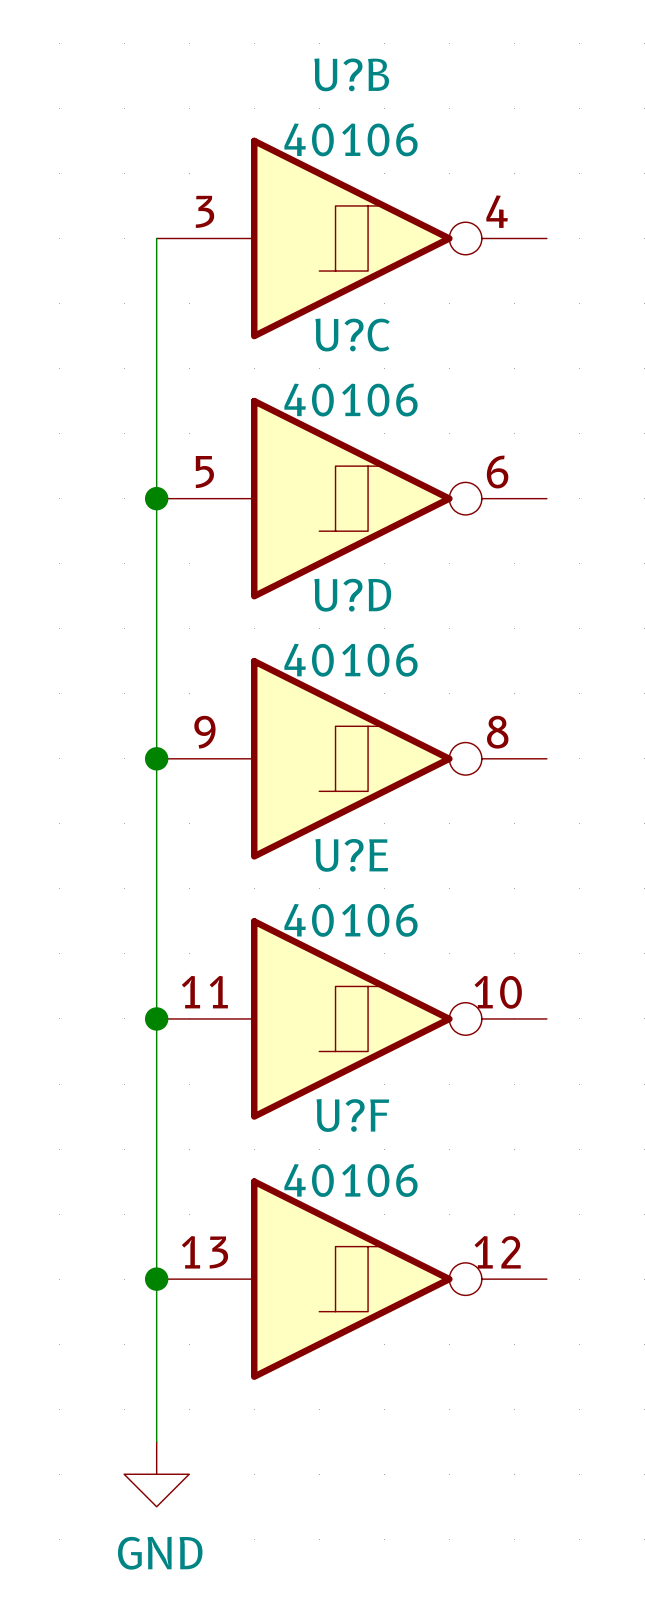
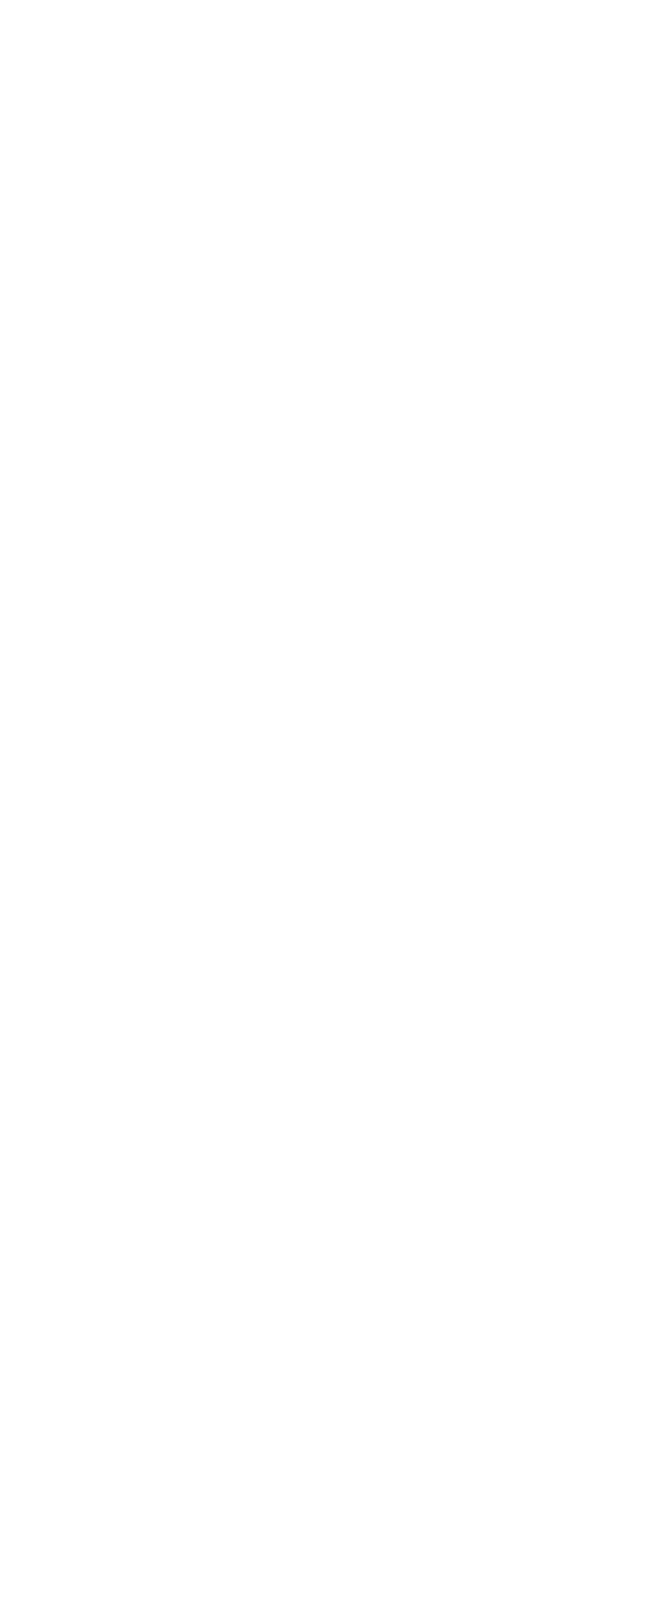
wire: (156, 238) (156, 1441) -> none
U?B: 40106 (351, 238) -> none
junction: (156, 498) -> none
U?C: 40106 (351, 498) -> none
junction: (156, 758) -> none
U?D: 40106 (351, 758) -> none
junction: (156, 1018) -> none
U?E: 40106 (351, 1018) -> none
junction: (156, 1279) -> none
U?F: 40106 (351, 1279) -> none
power symbol: GND (156, 1474) -> none

